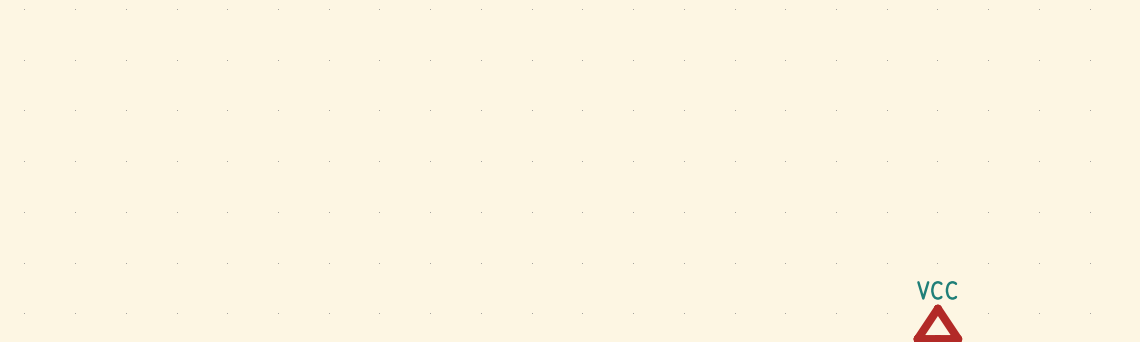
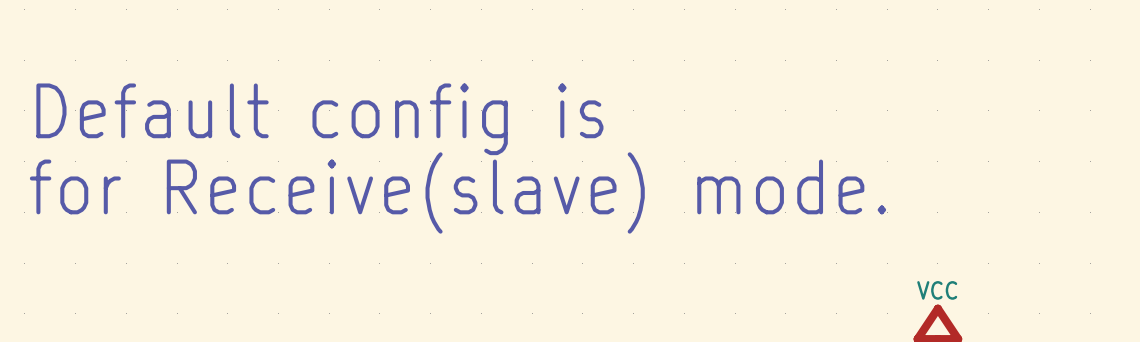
text: none -> Default config is (319, 119)
text: none -> for Receive(slave) mode. (457, 192)

